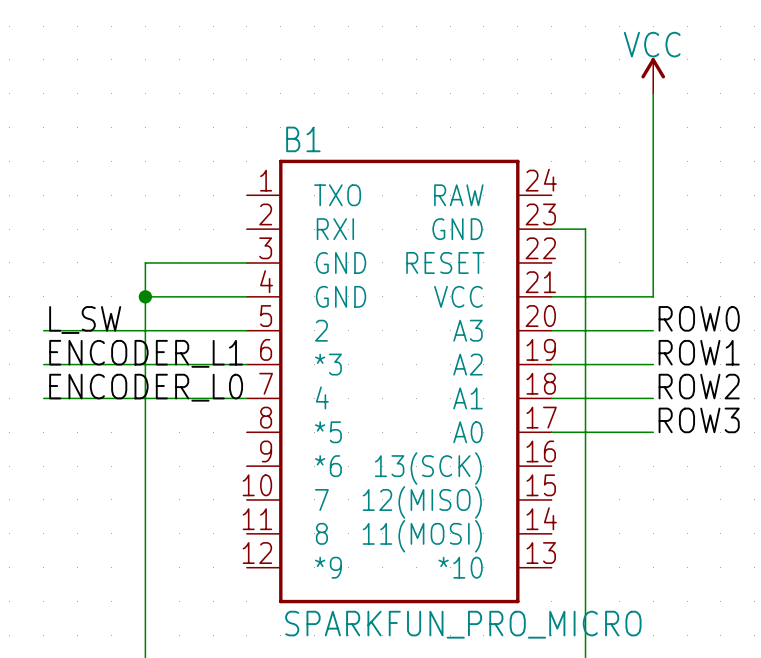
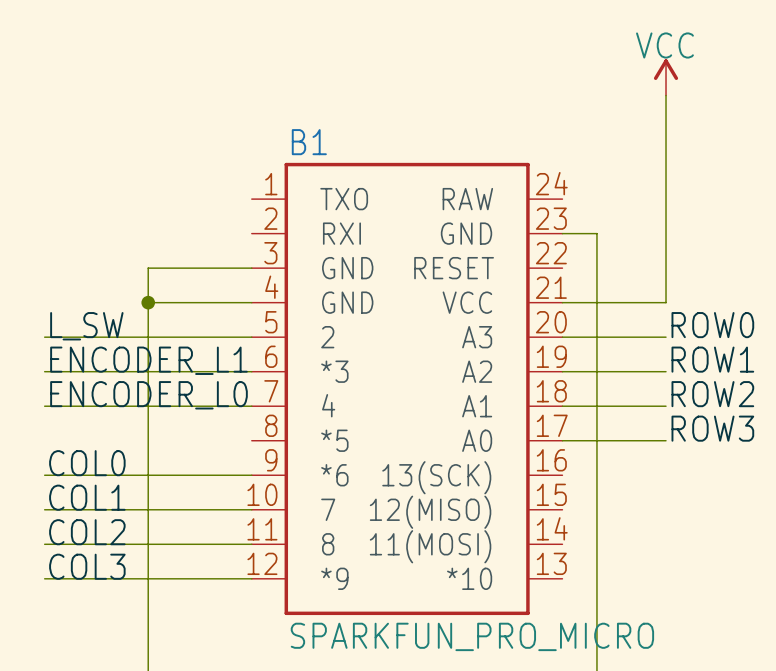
label: none -> COL0 (87, 463)
wire: none -> (44, 475) (251, 475)
label: none -> COL1 (87, 497)
wire: none -> (44, 509) (251, 509)
label: none -> COL2 (87, 532)
wire: none -> (44, 544) (251, 544)
label: none -> COL3 (87, 566)
wire: none -> (44, 578) (251, 578)

